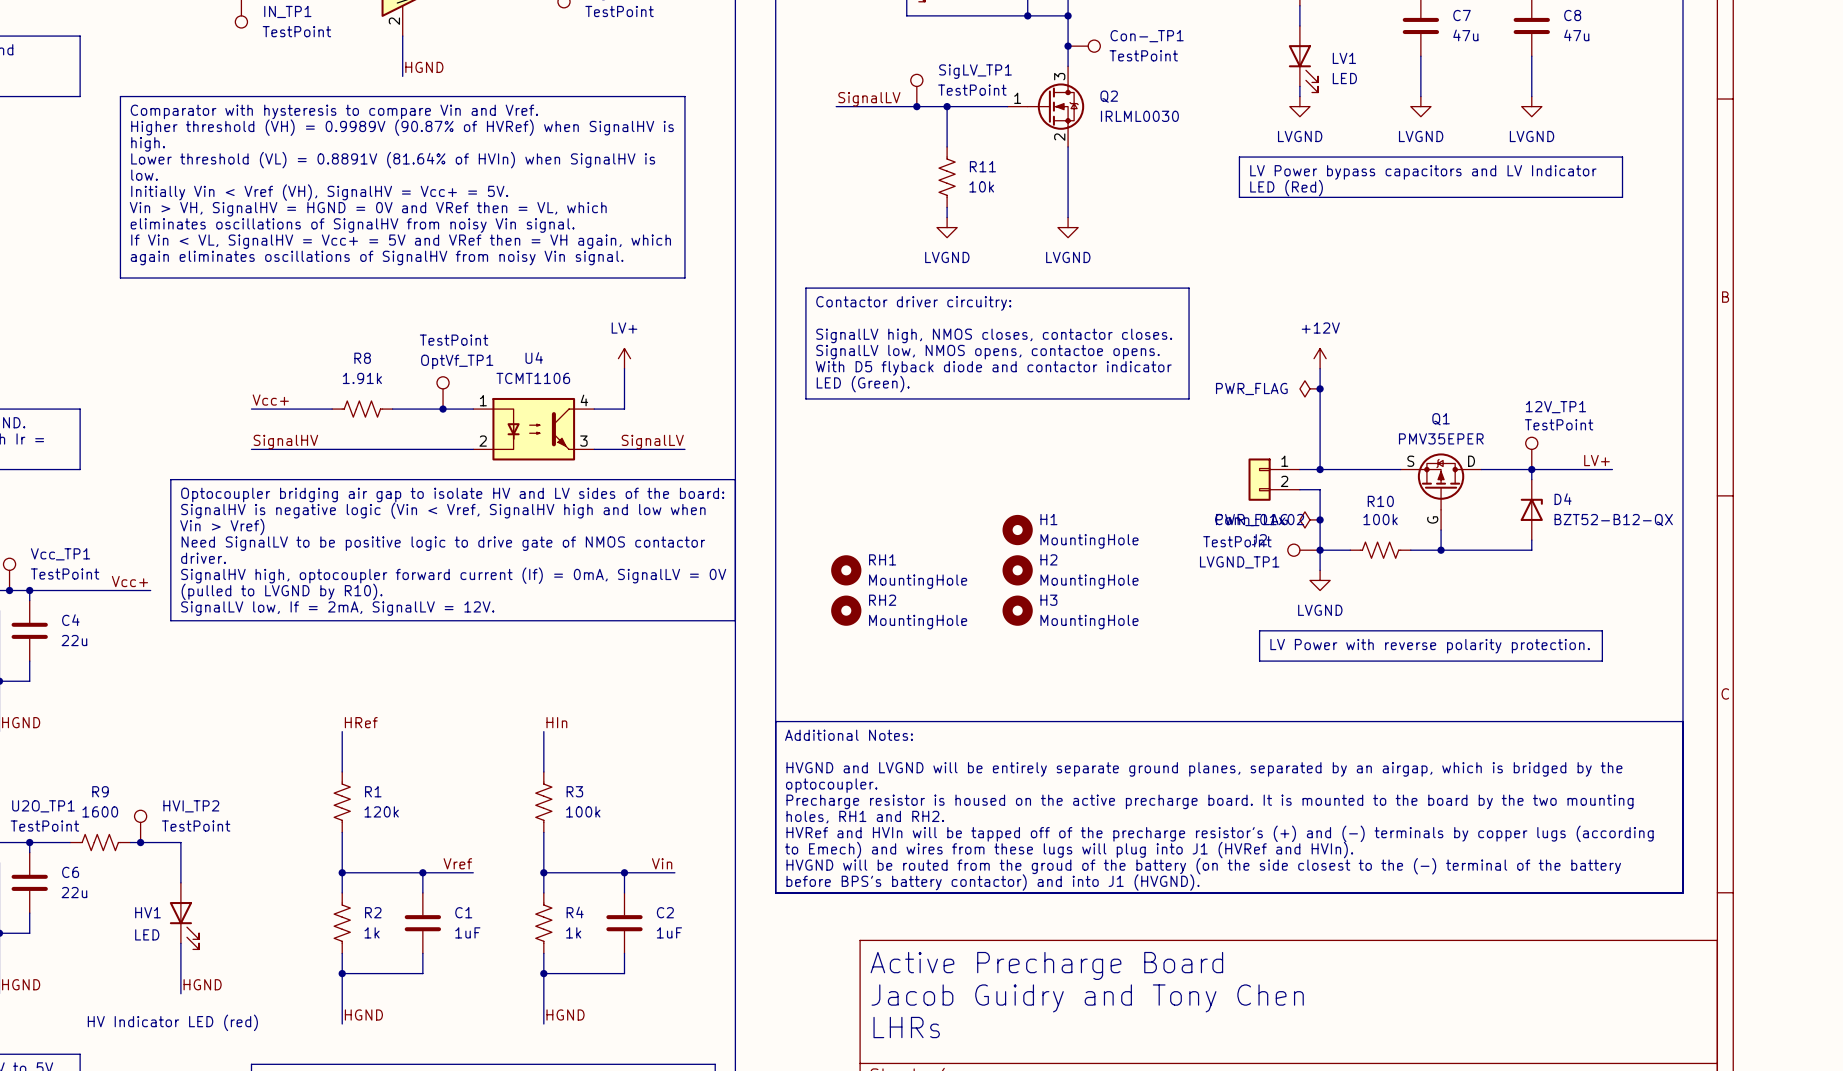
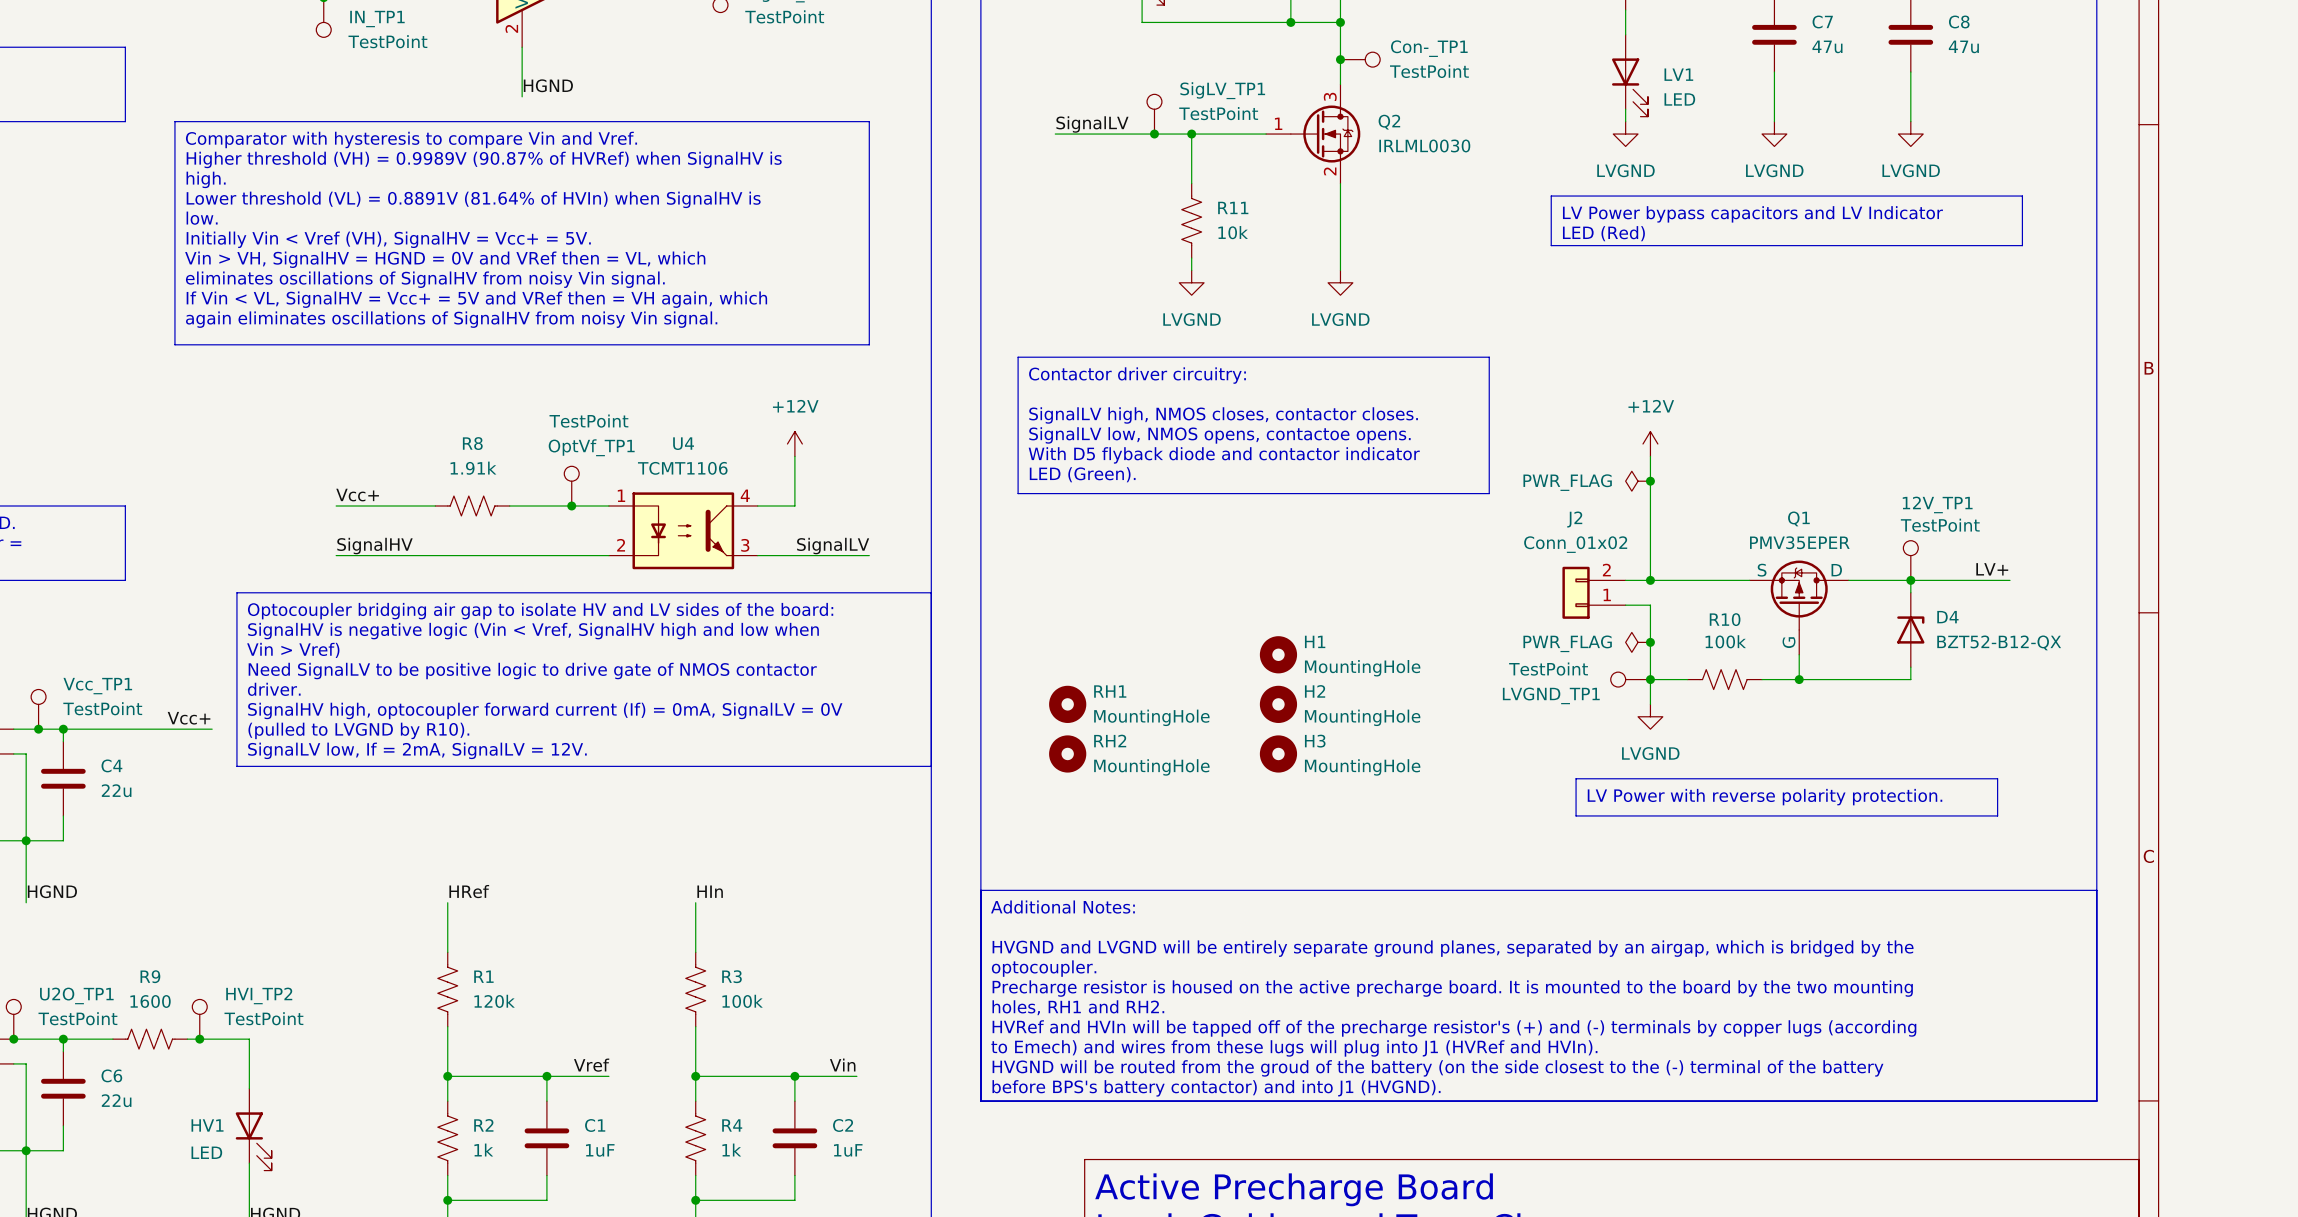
power symbol: LV+ (624, 358) -> +12V (794, 444)
J2 flip: as is (1259, 479) -> up-down (1576, 592)

